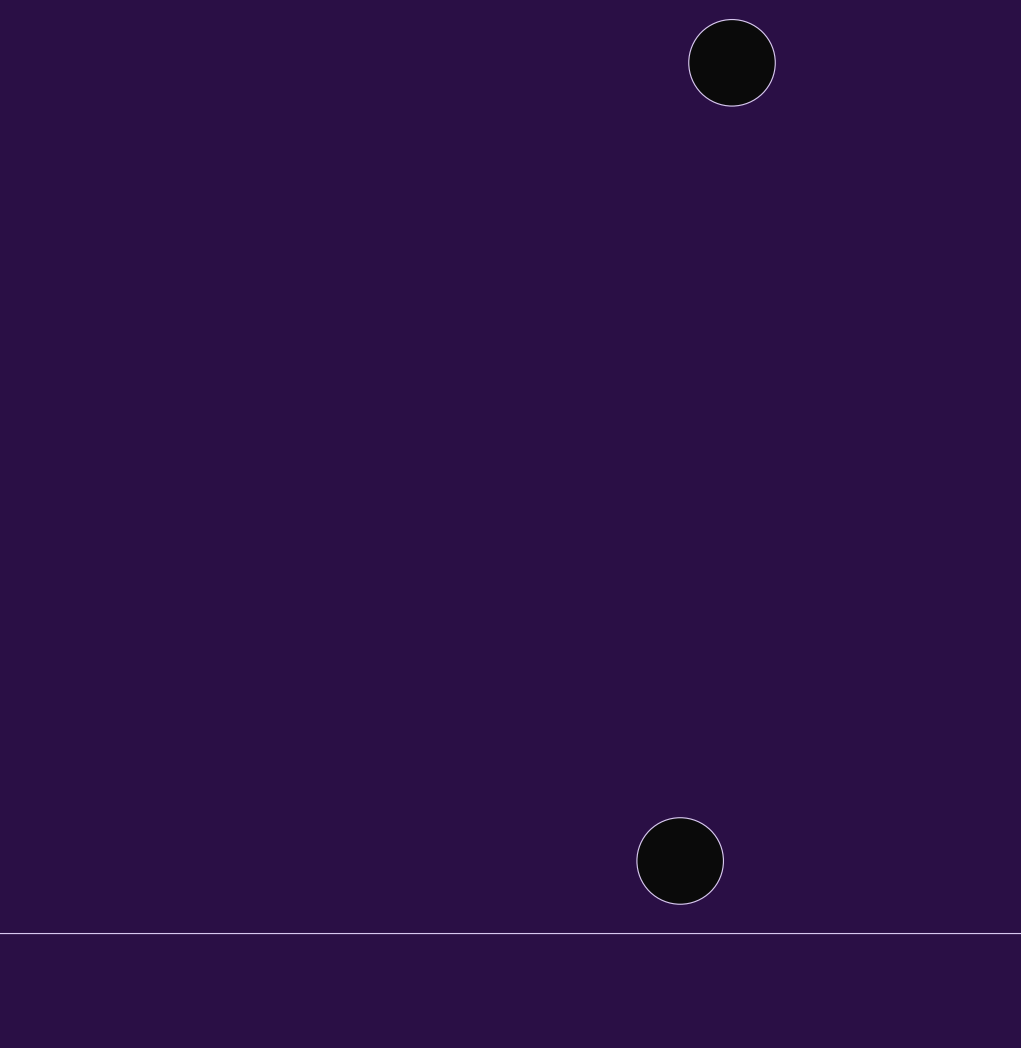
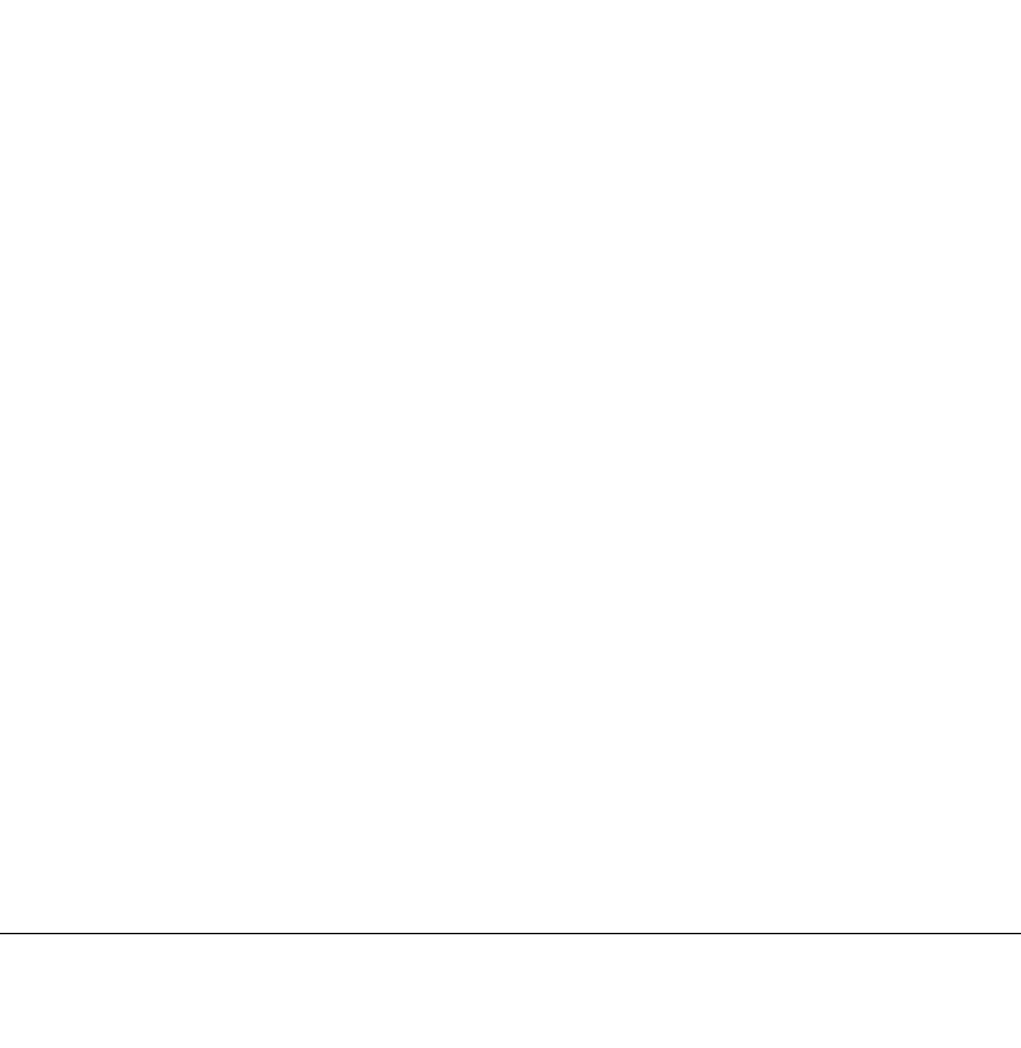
hole: (732, 62) -> none
hole: (680, 860) -> none

